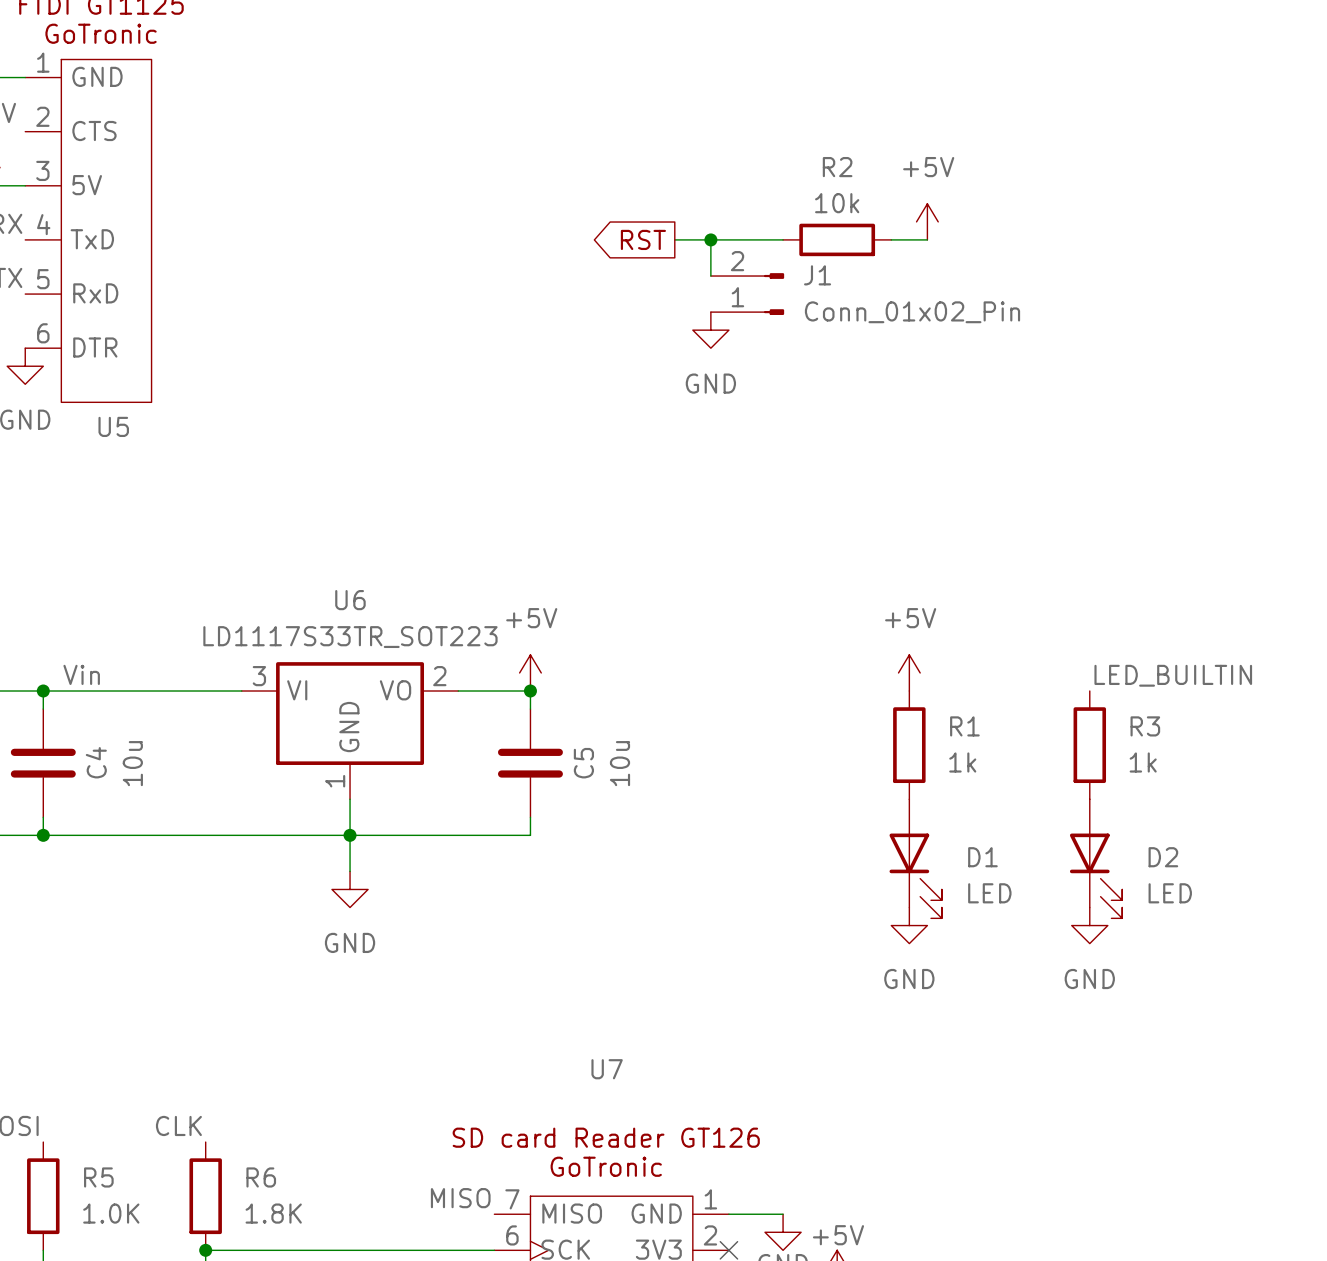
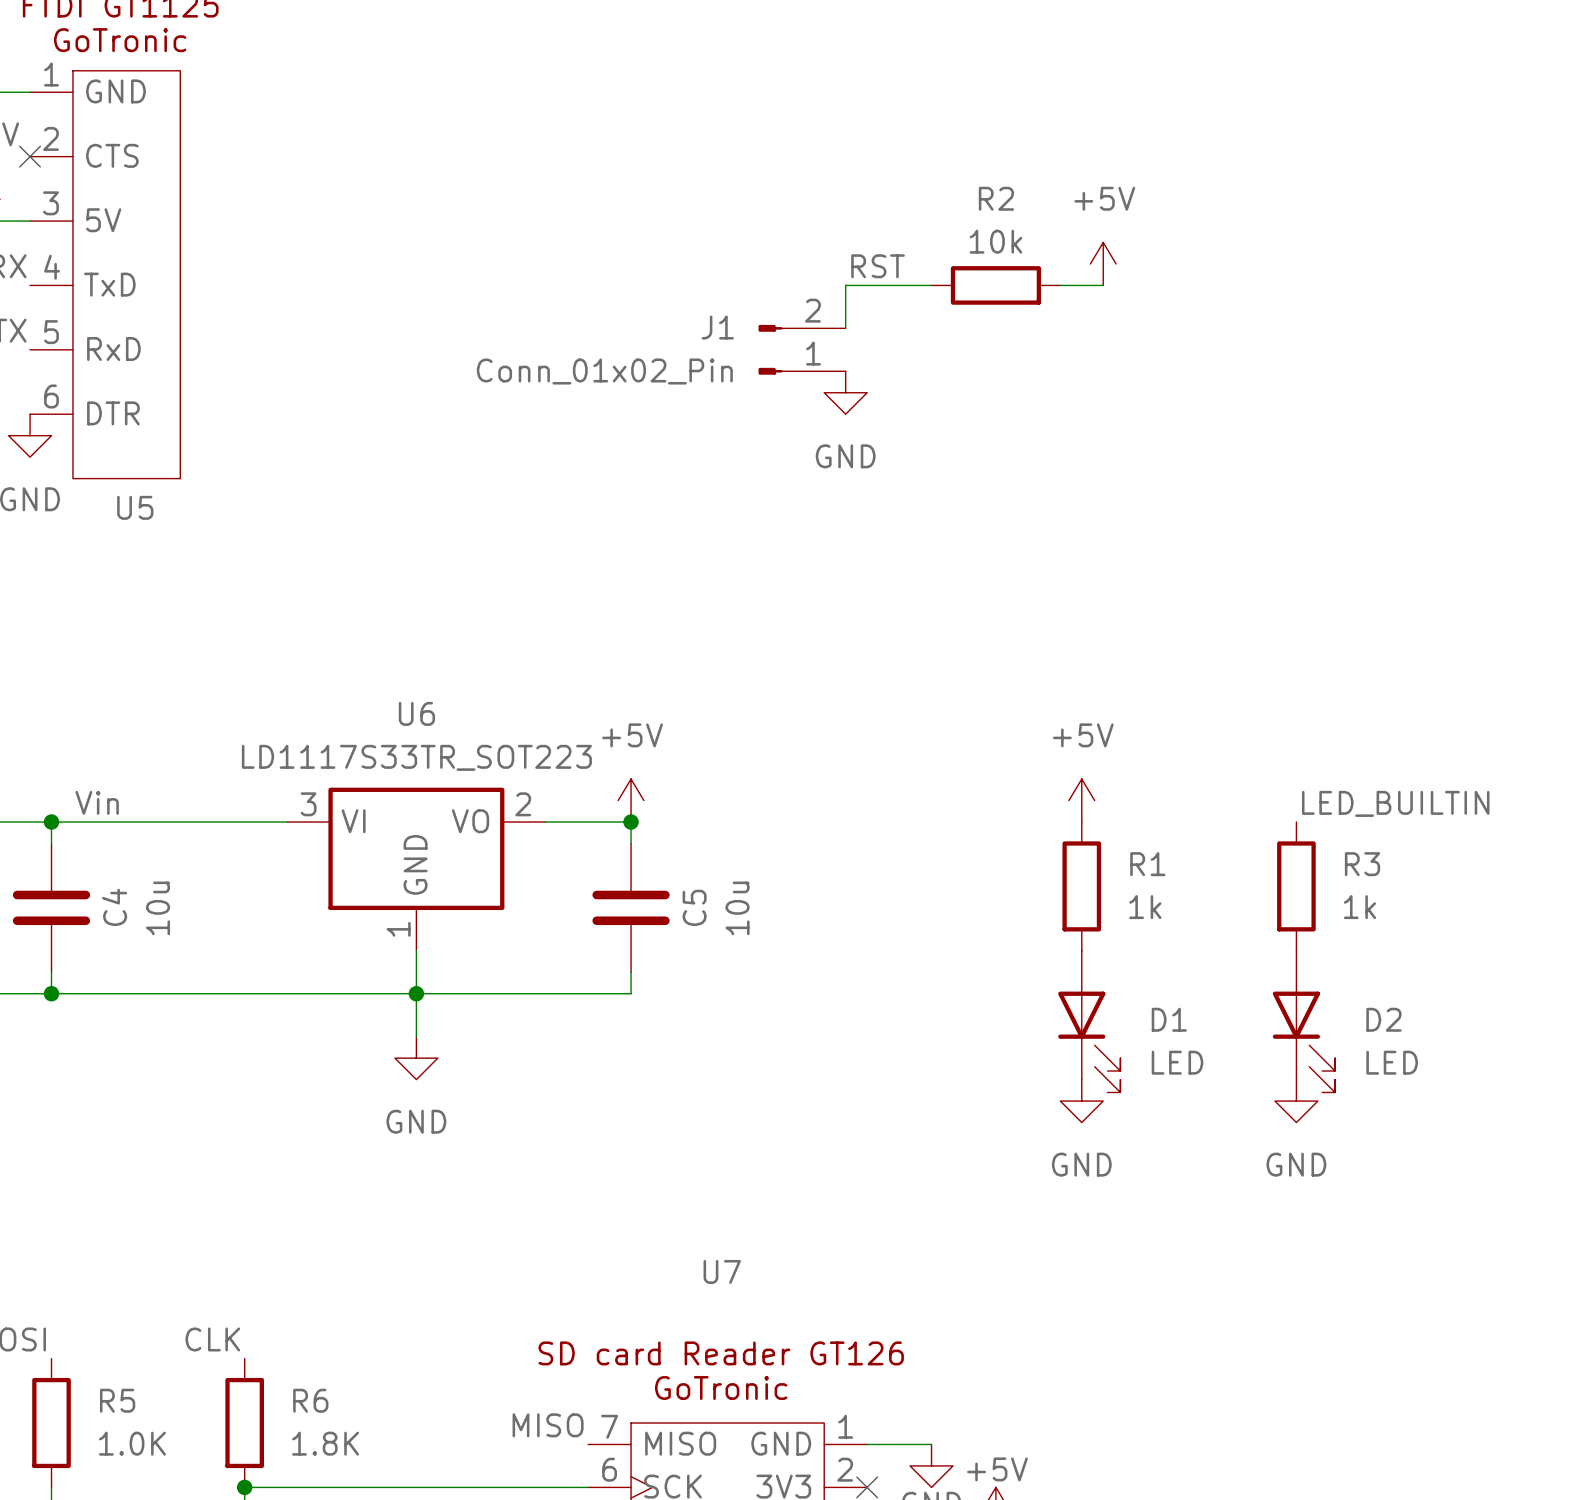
no-connect mark: none -> (30, 156)
label: none -> RST (878, 266)
global label: RST (643, 239) -> none
wire: (674, 239) (710, 239) -> none
junction: (710, 239) -> none
J1 position: (747, 294) -> (802, 349)
J1 flip: as is (774, 294) -> left-right (770, 349)

